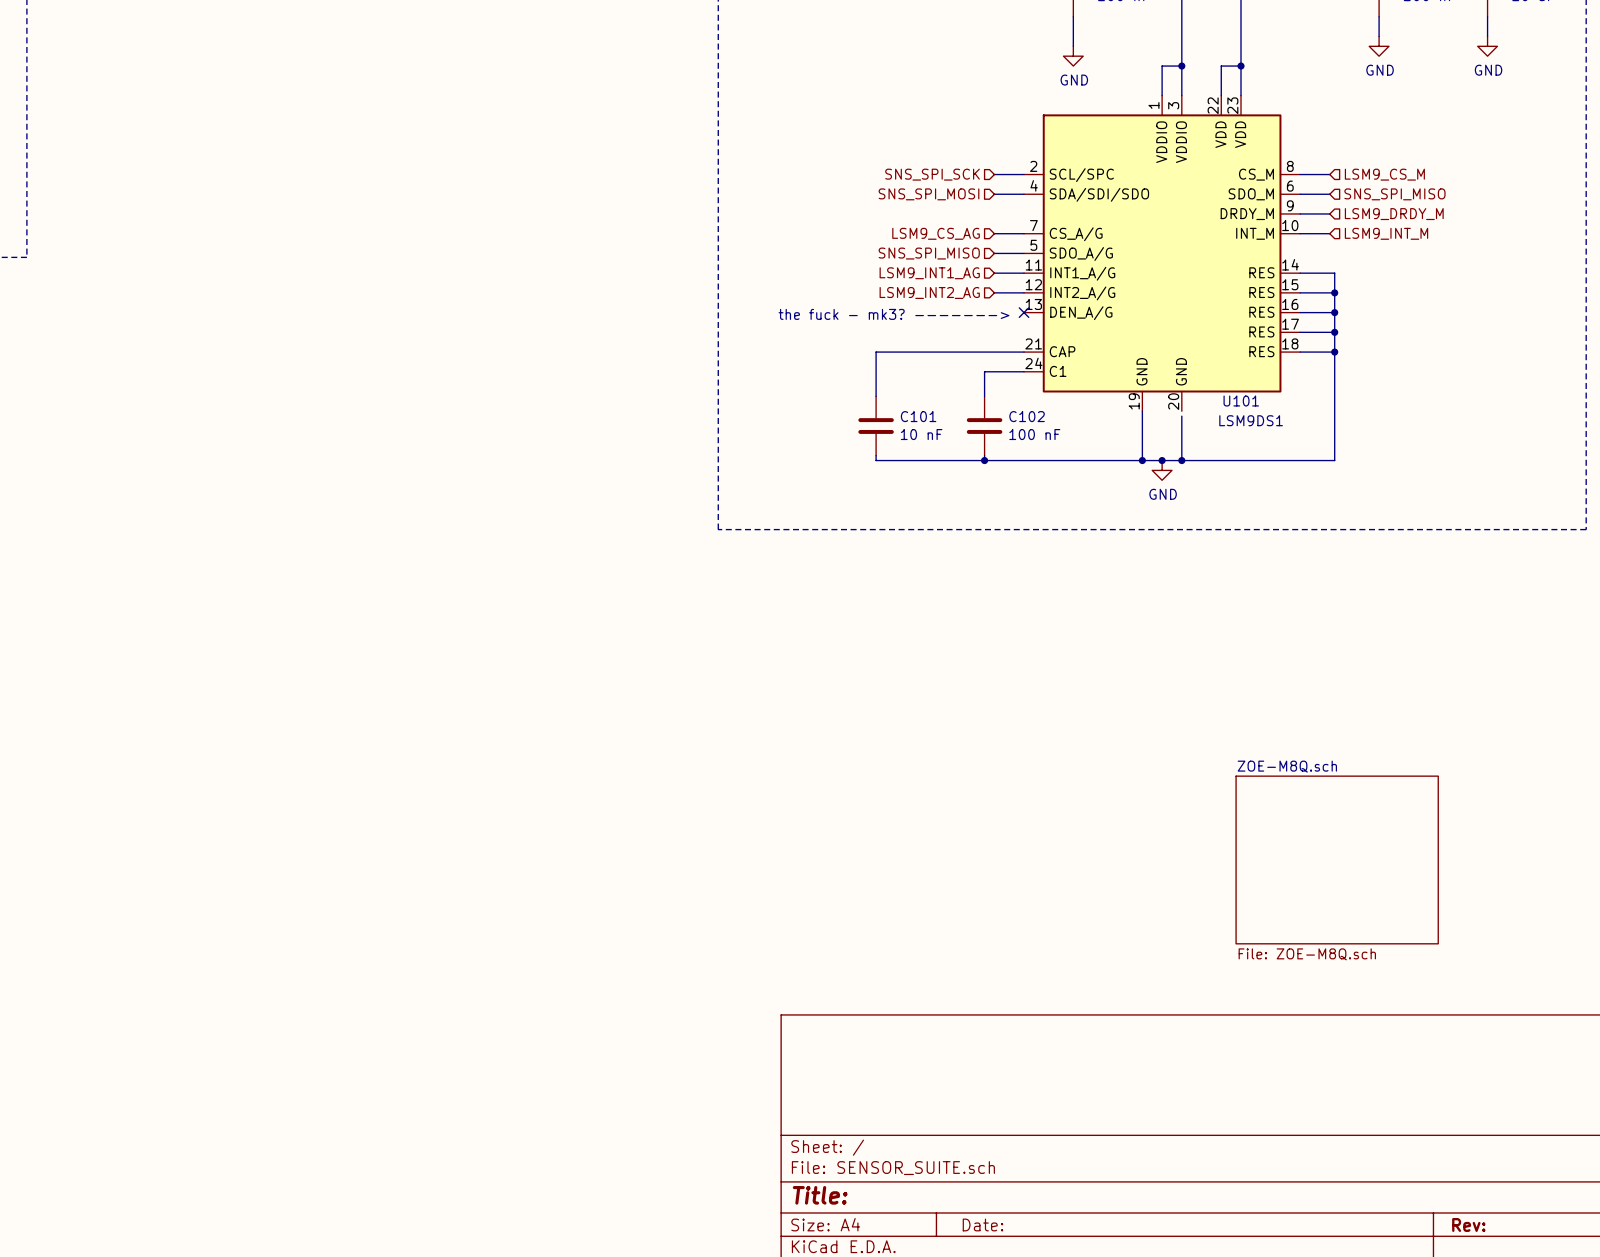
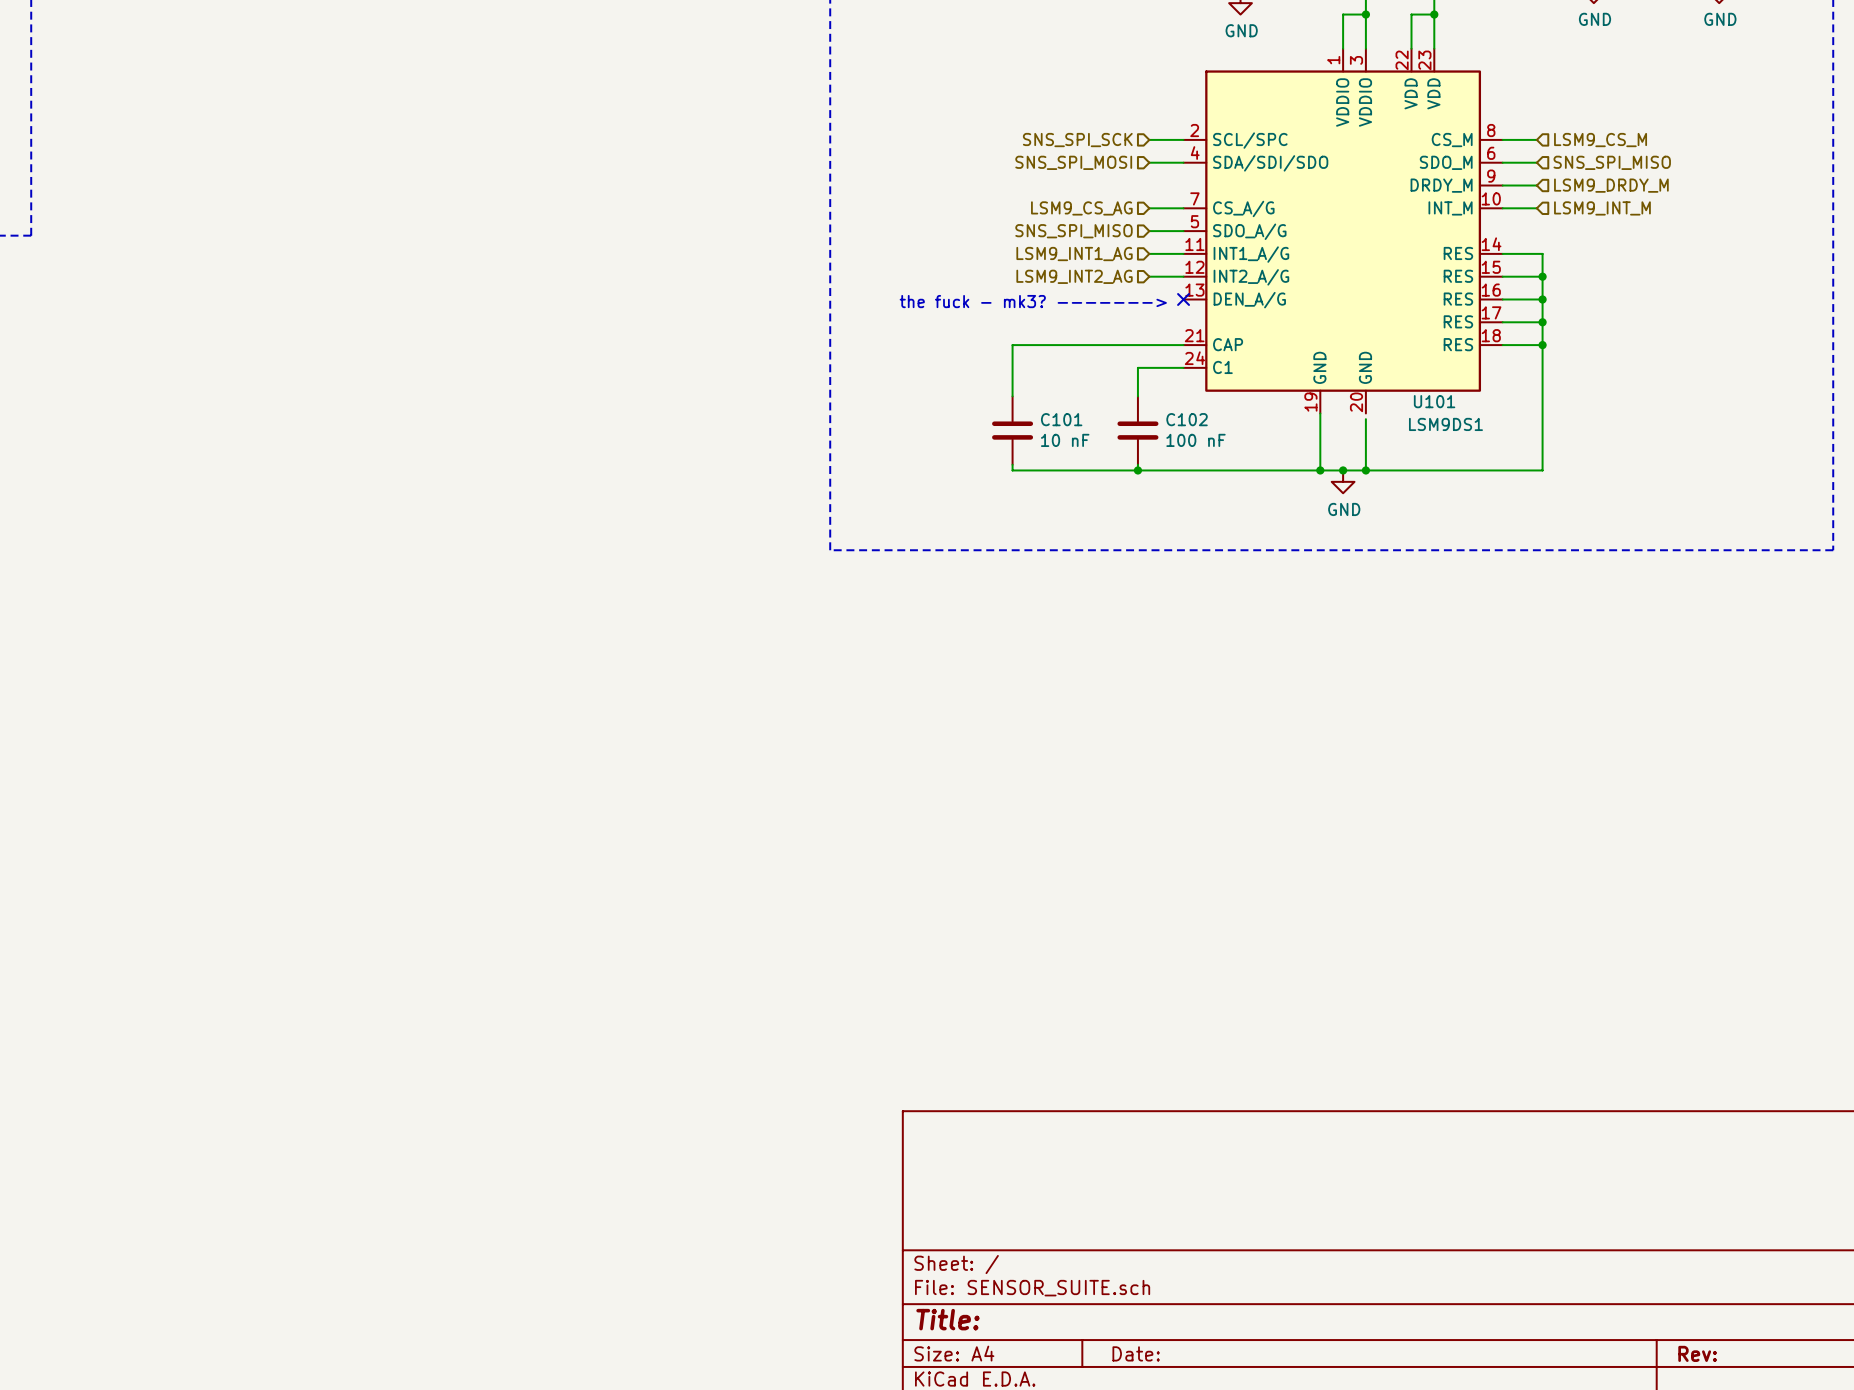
sheet ZOE-M8Q.sch: File: ZOE-M8Q.sch (1337, 859) -> none

